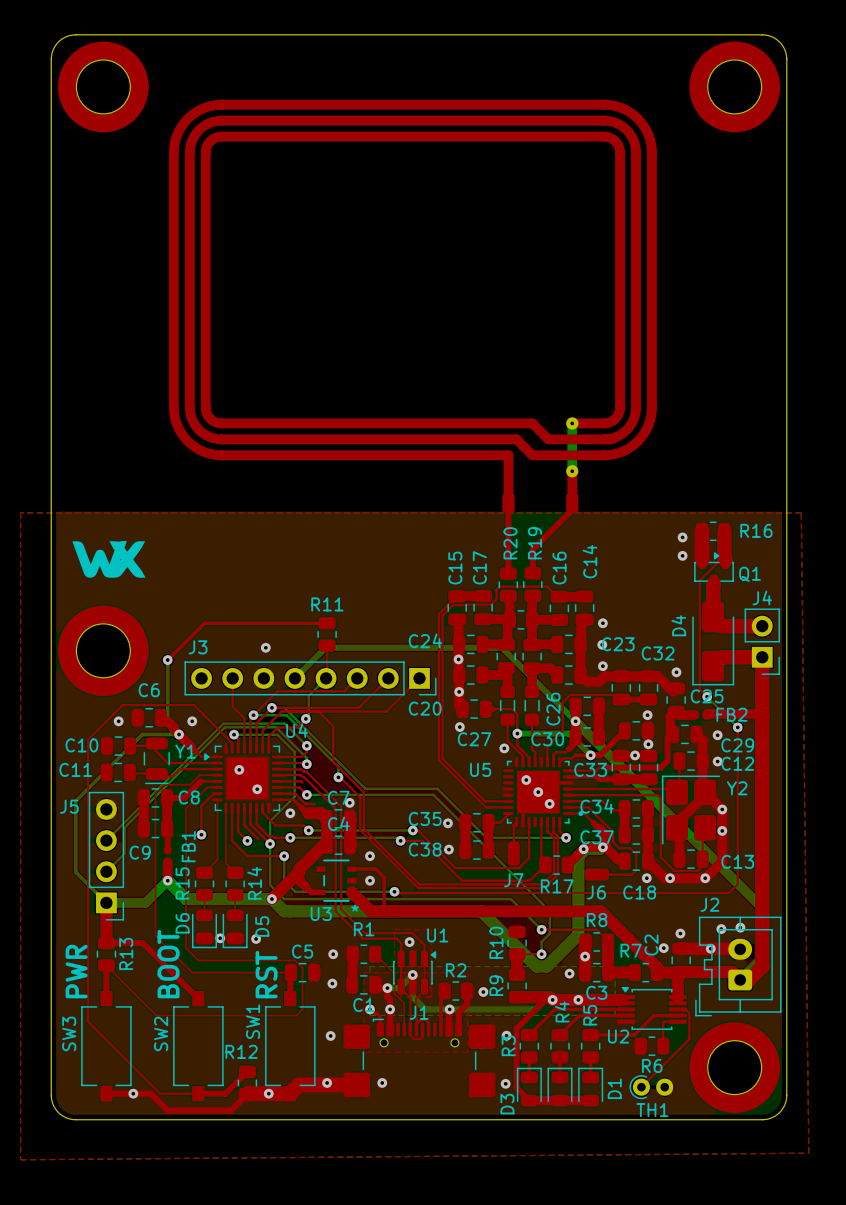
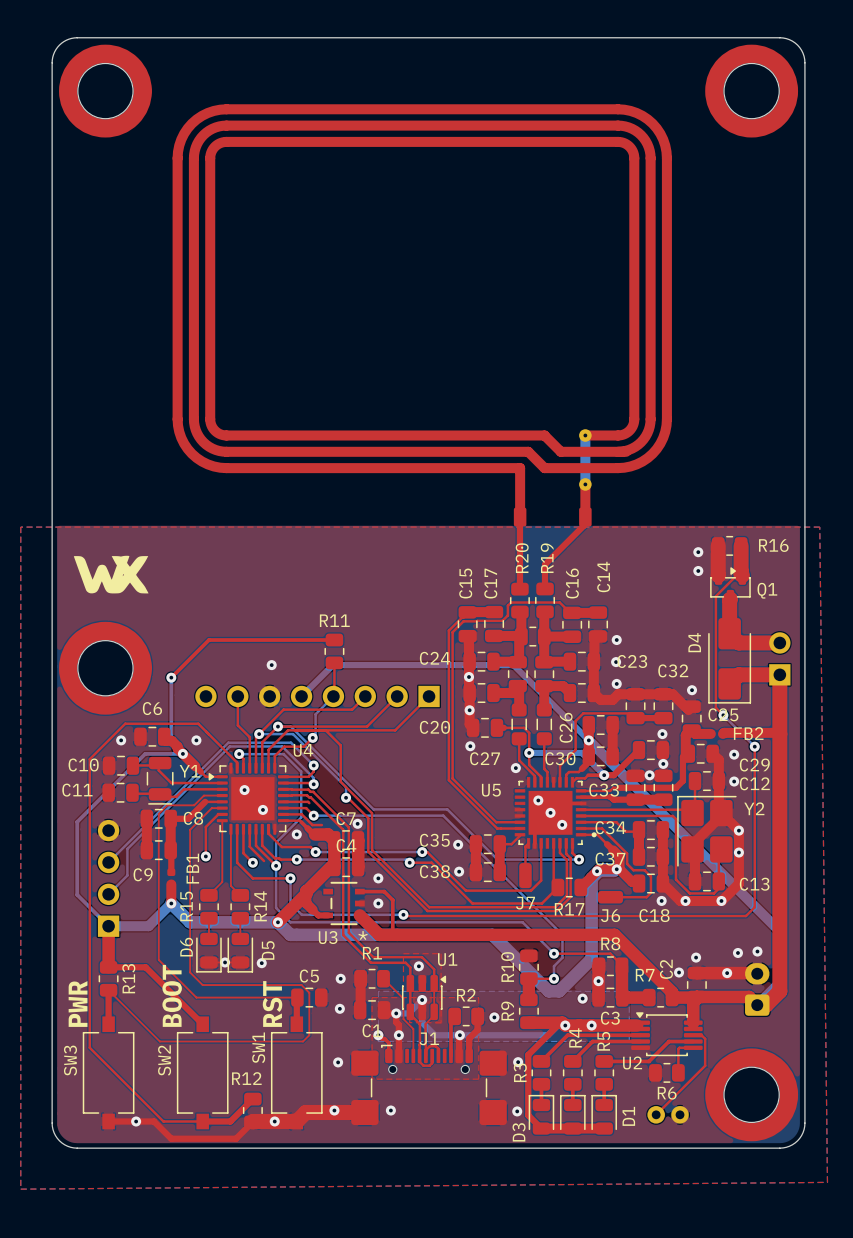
J4 side: top (762, 641) -> bottom (779, 658)
J3 side: top (310, 678) -> bottom (317, 696)
J5 side: top (106, 856) -> bottom (108, 878)
J2 side: top (738, 966) -> bottom (757, 989)
TH1 side: top (651, 1087) -> bottom (668, 1114)

